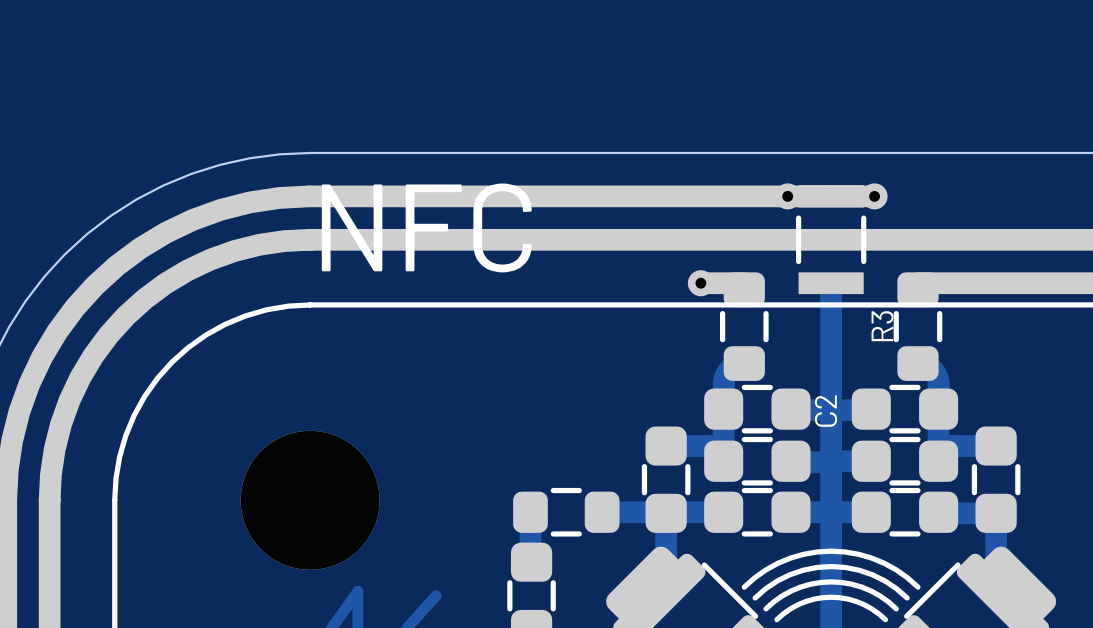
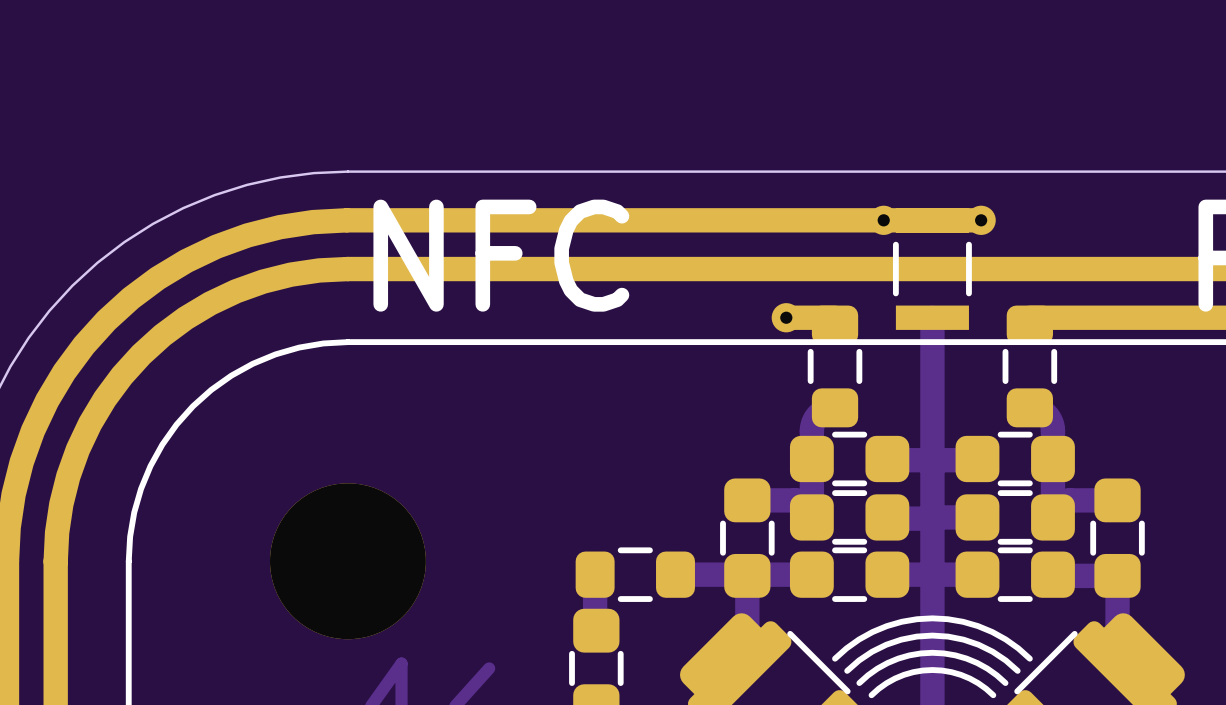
R3: (882, 326) -> none
C2 name: C2 (826, 411) -> none

